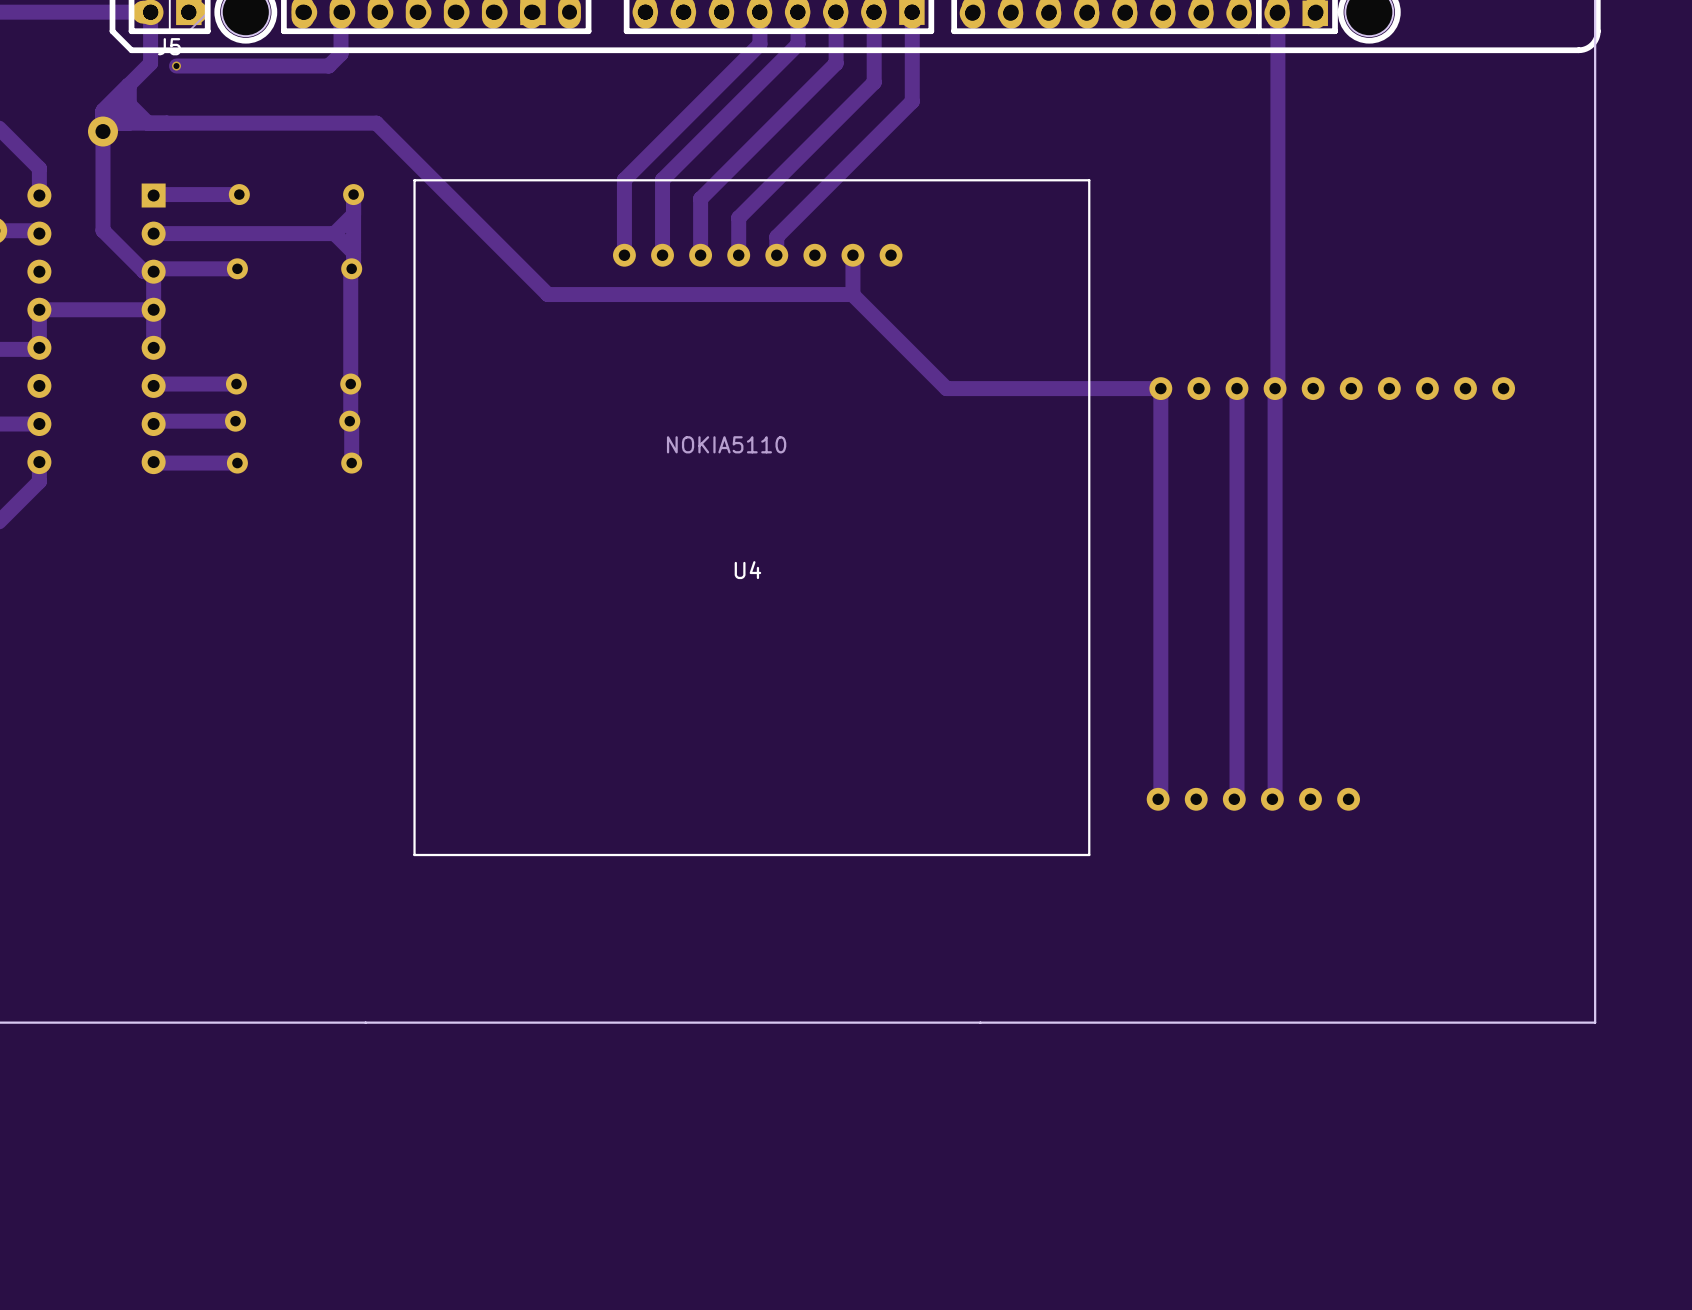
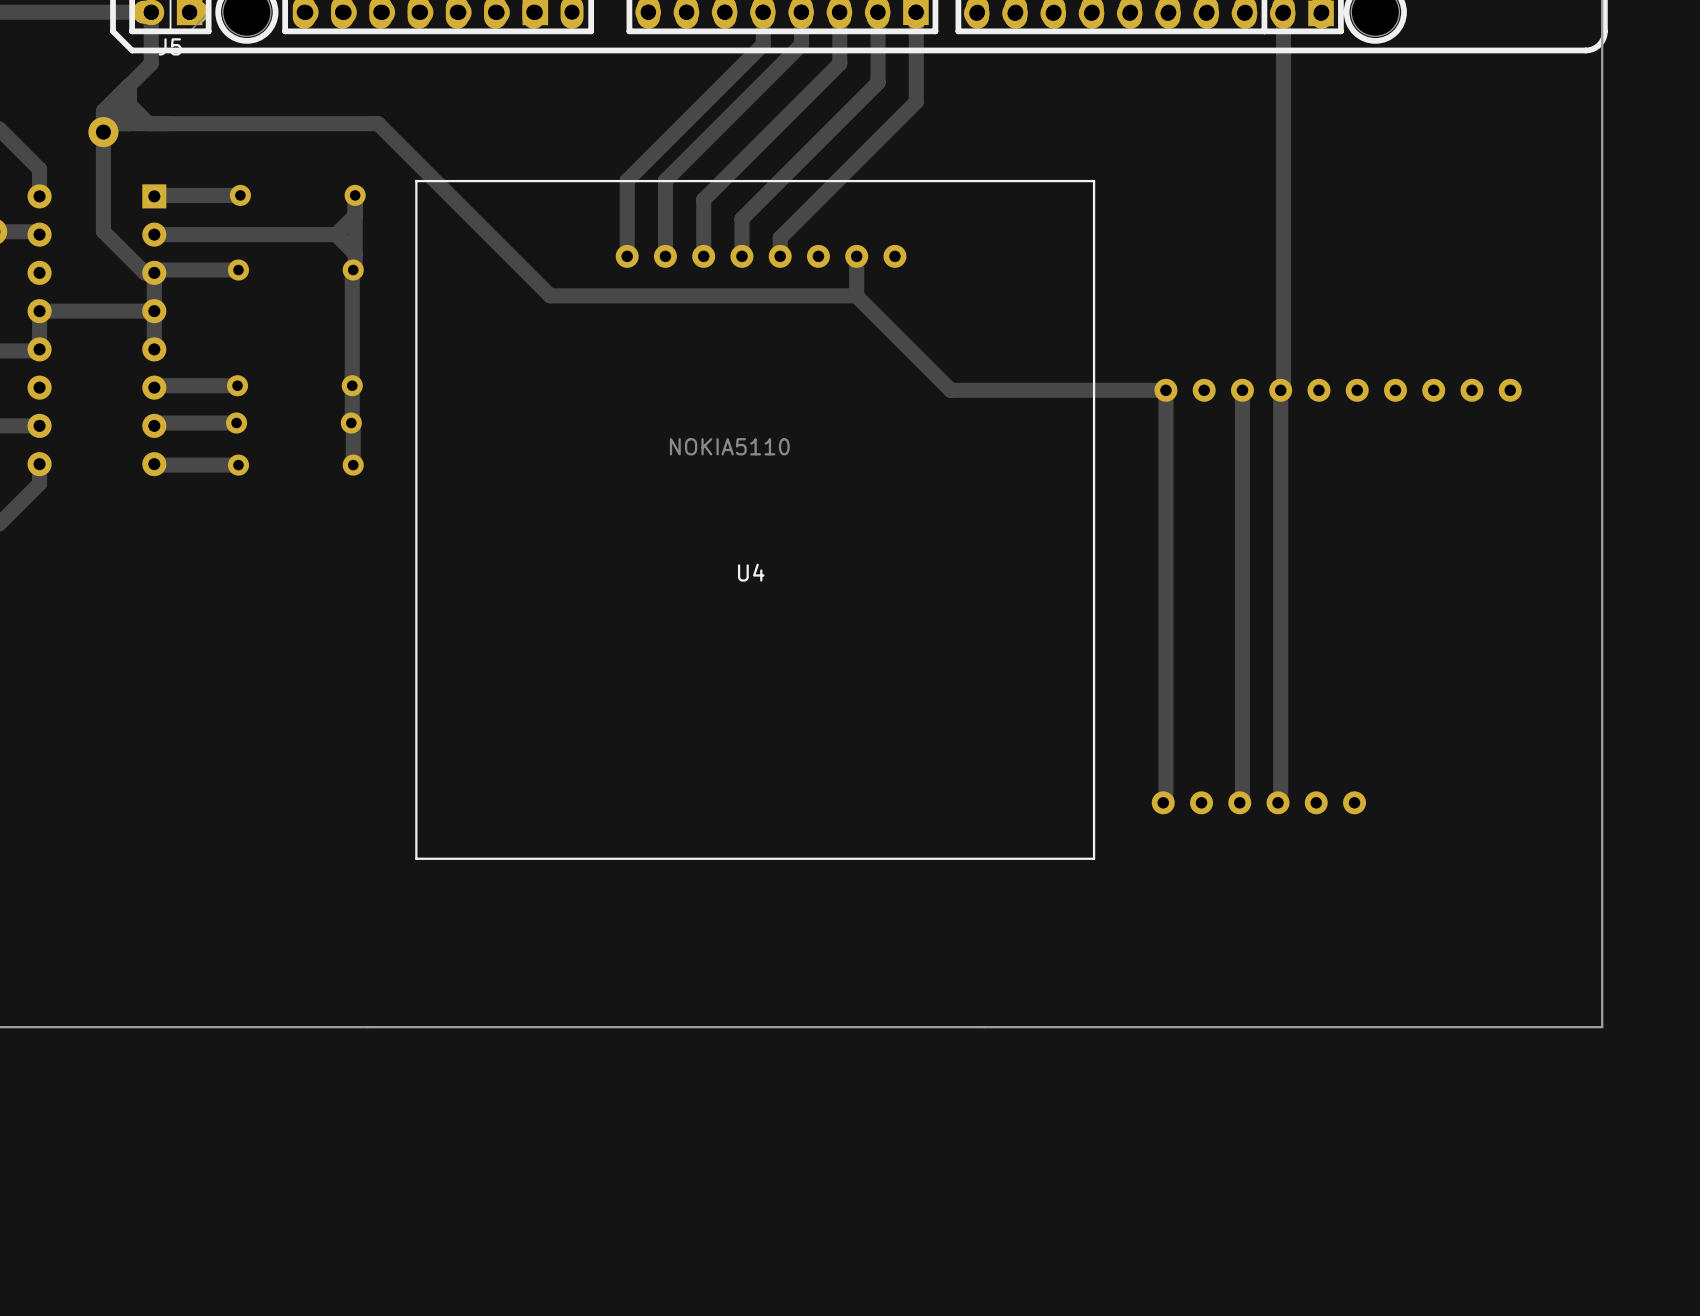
track: (341, 12) (341, 53) (328, 66) (176, 66) -> none
via: (176, 66) -> none

